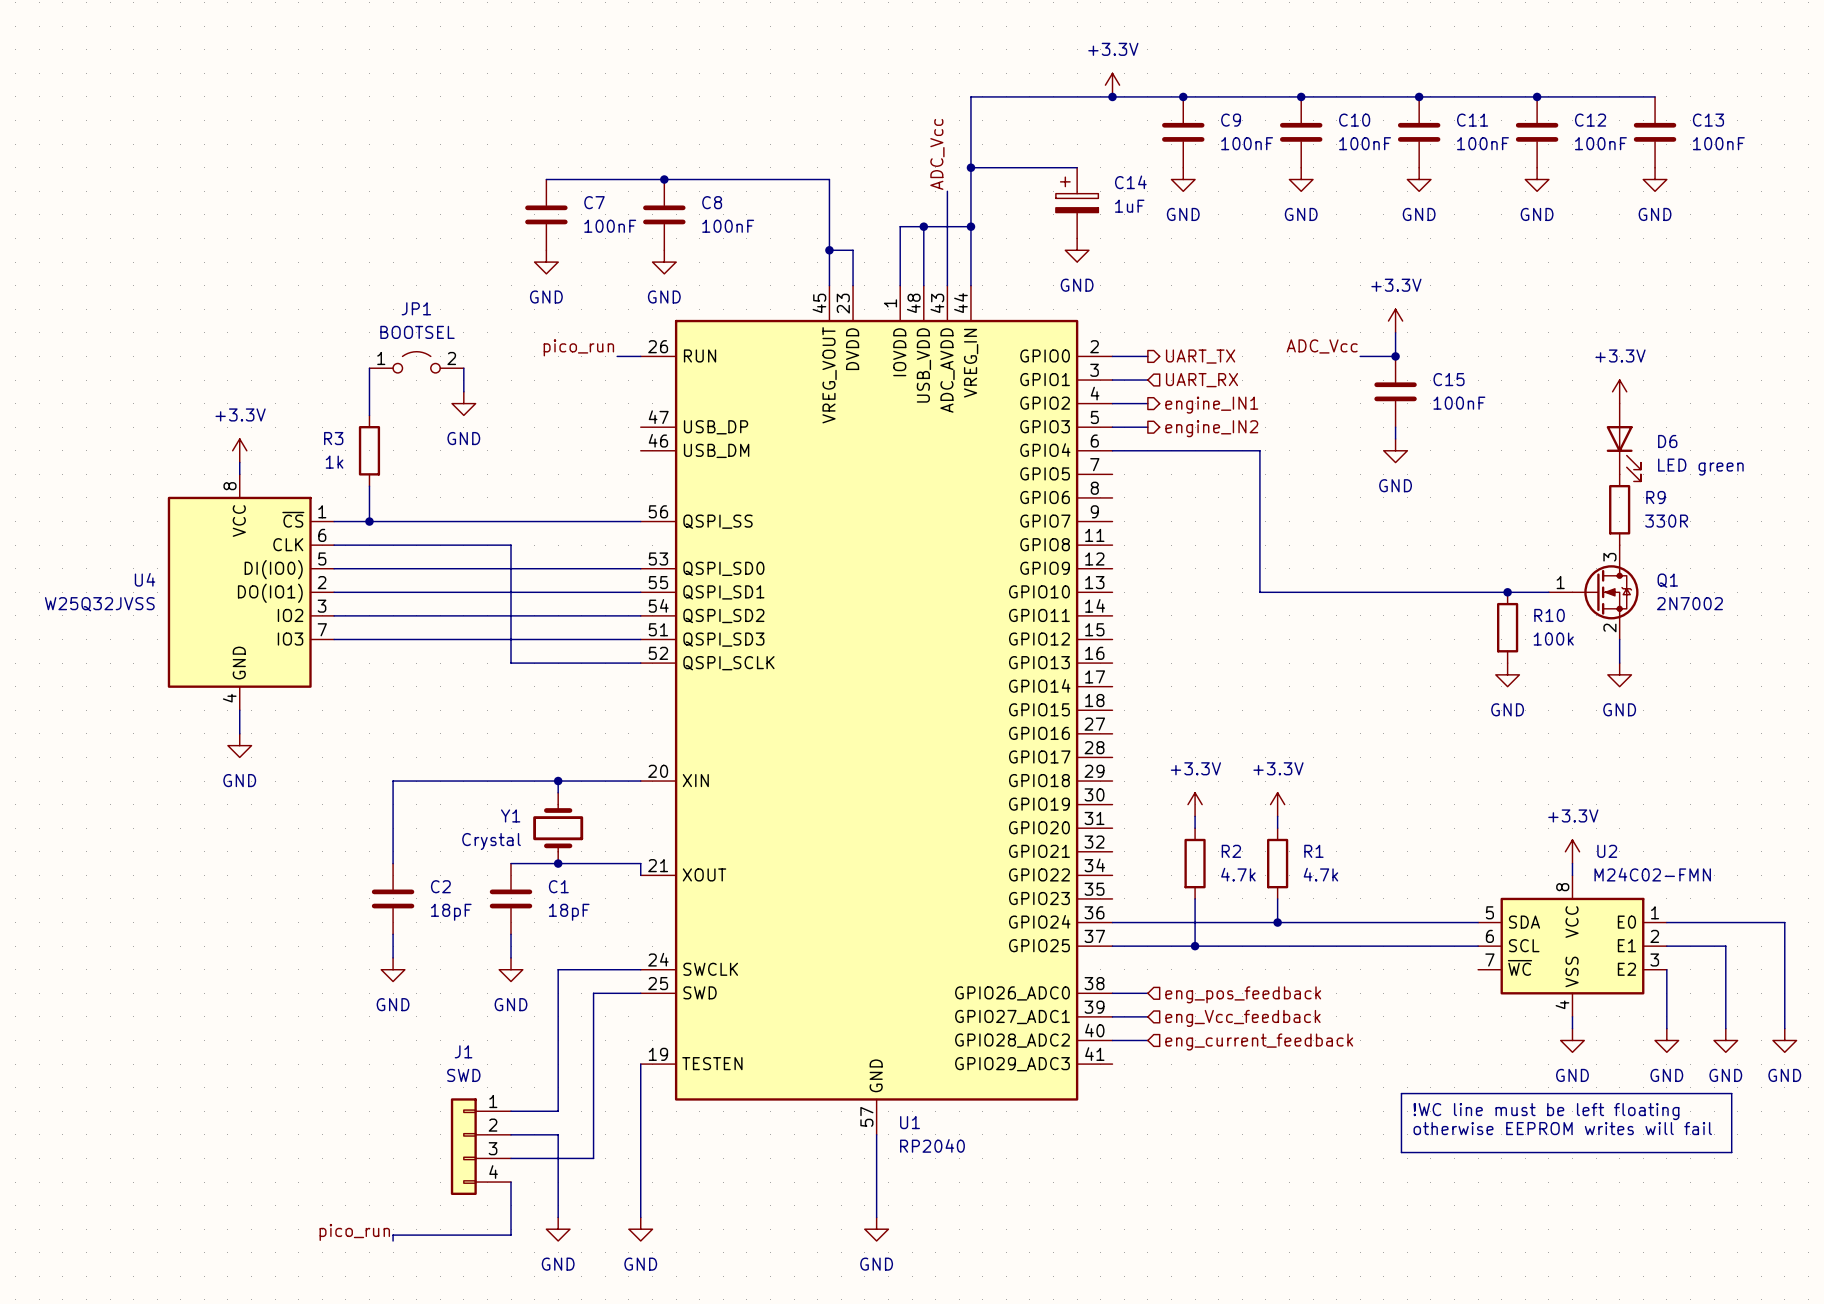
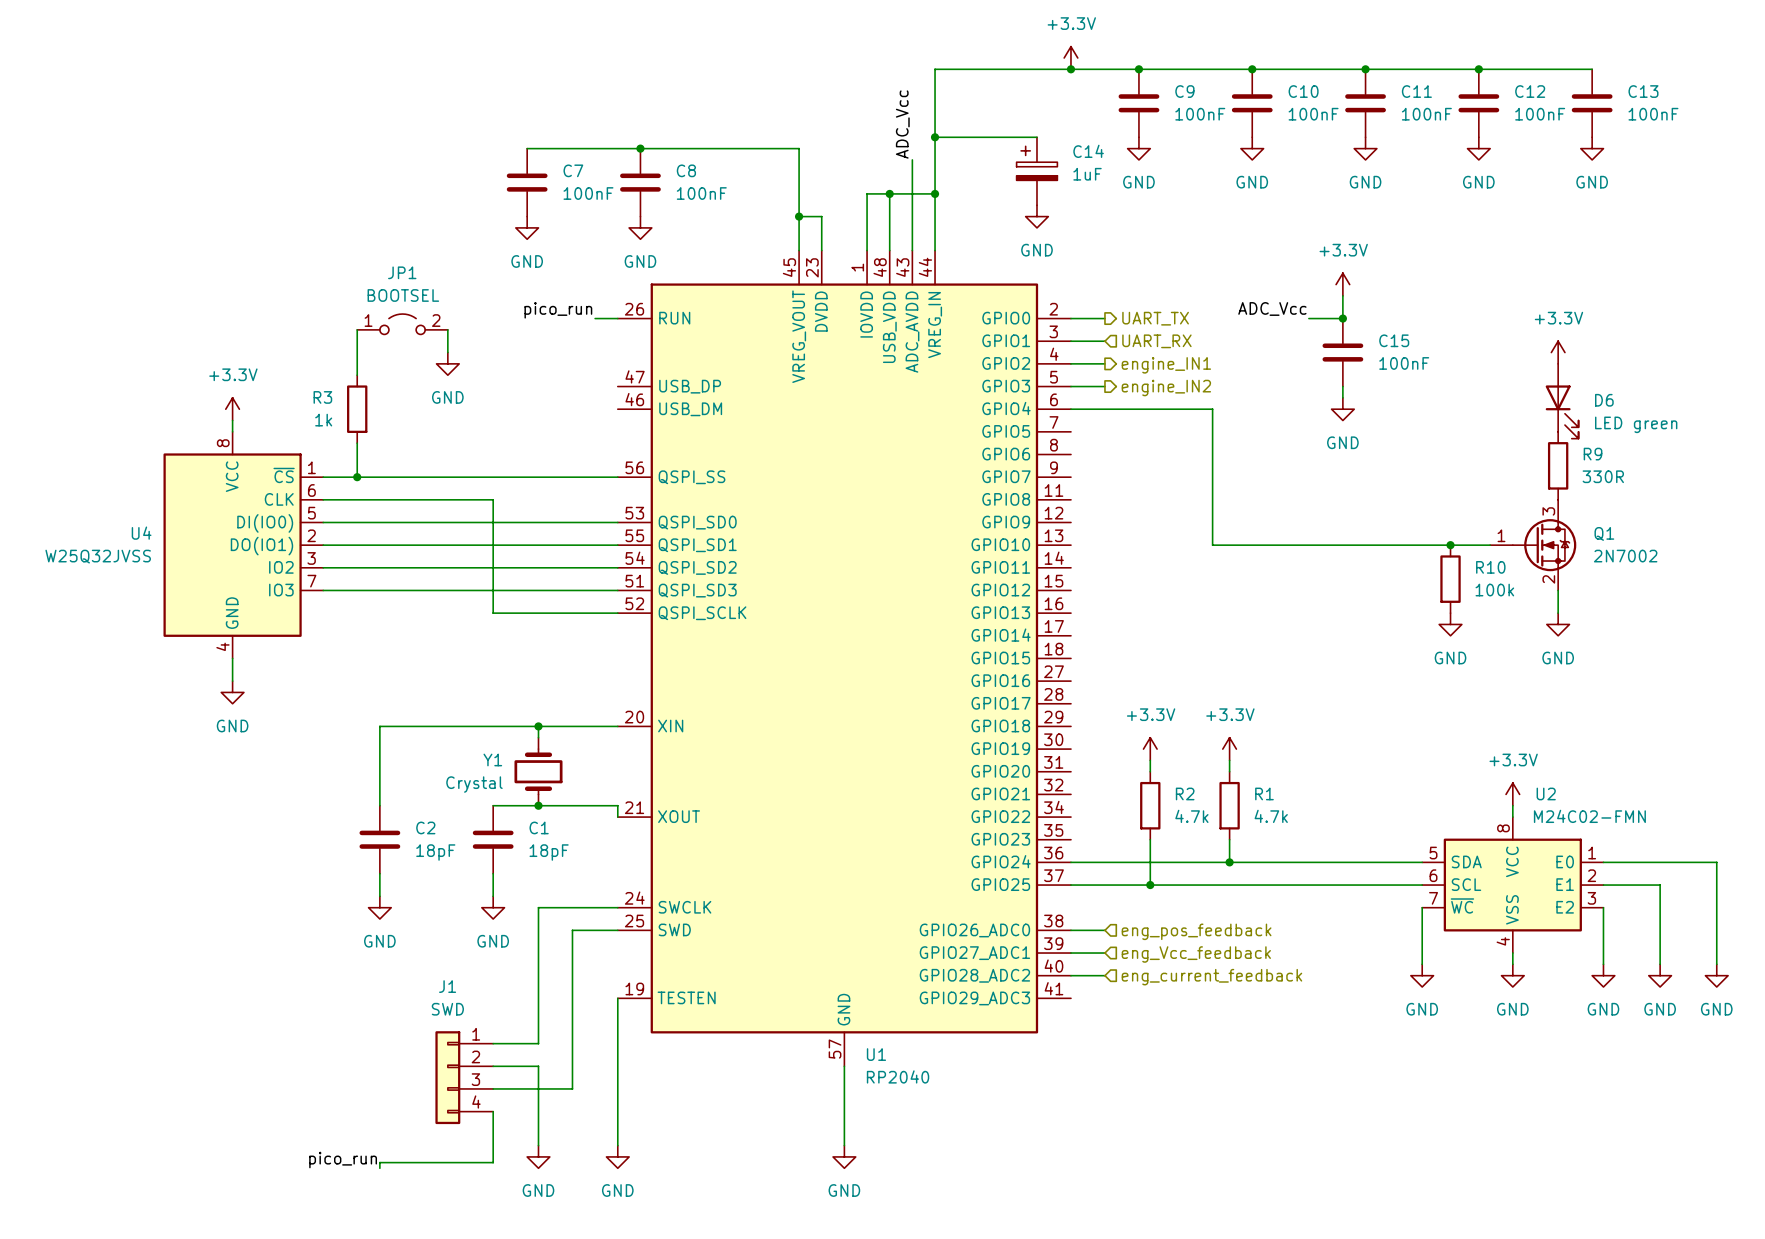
wire: none -> (1422, 907) (1422, 964)
power symbol: none -> GND (1422, 975)
line: (1401, 1093) (1731, 1093) (1731, 1152) (1401, 1152) (1401, 1093) -> none
text: !WC line must be left floating (1546, 1111) -> none
text: otherwise EEPROM writes will fail (1562, 1128) -> none

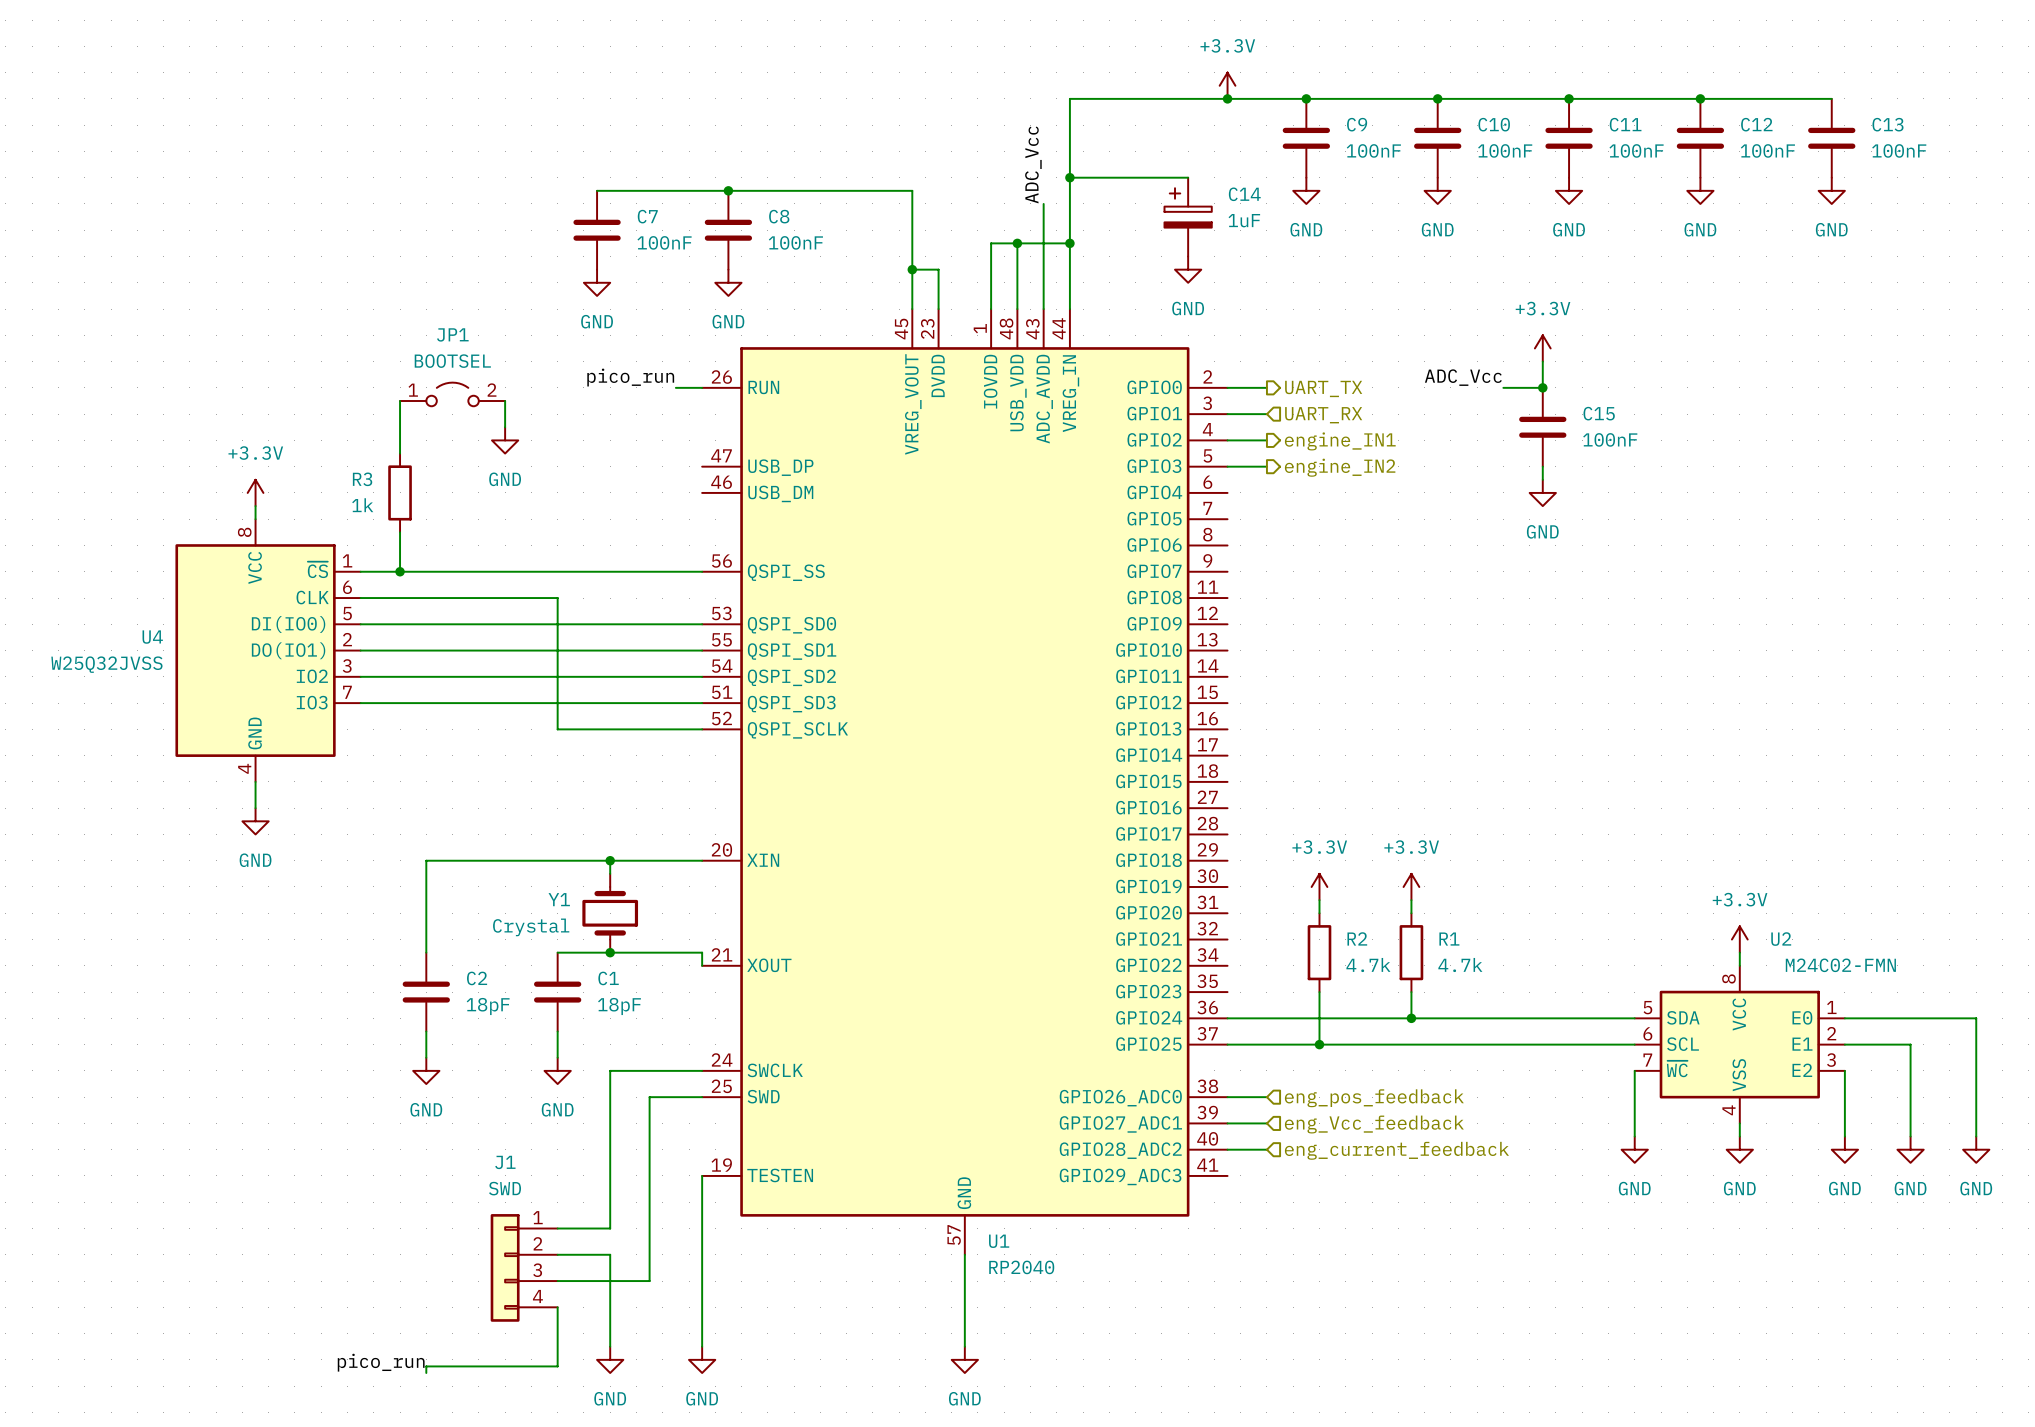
power symbol: +3.3V (1558, 352) -> none
D6: LED green (1562, 401) -> none
wire: (1070, 409) (1212, 409) (1212, 545) (1490, 545) -> none
R9: 330R (1558, 465) -> none
junction: (1450, 545) -> none
Q1: 2N7002 (1533, 545) -> none
R10: 100k (1450, 579) -> none
wire: (1558, 590) (1558, 613) -> none
power symbol: GND (1450, 624) -> none
power symbol: GND (1558, 624) -> none

